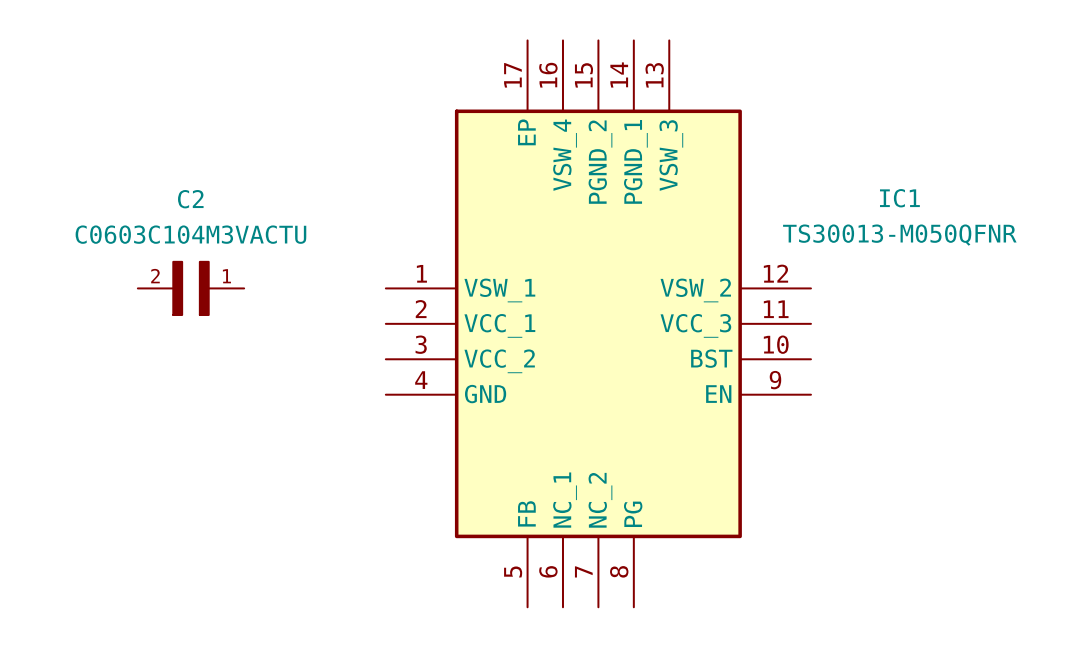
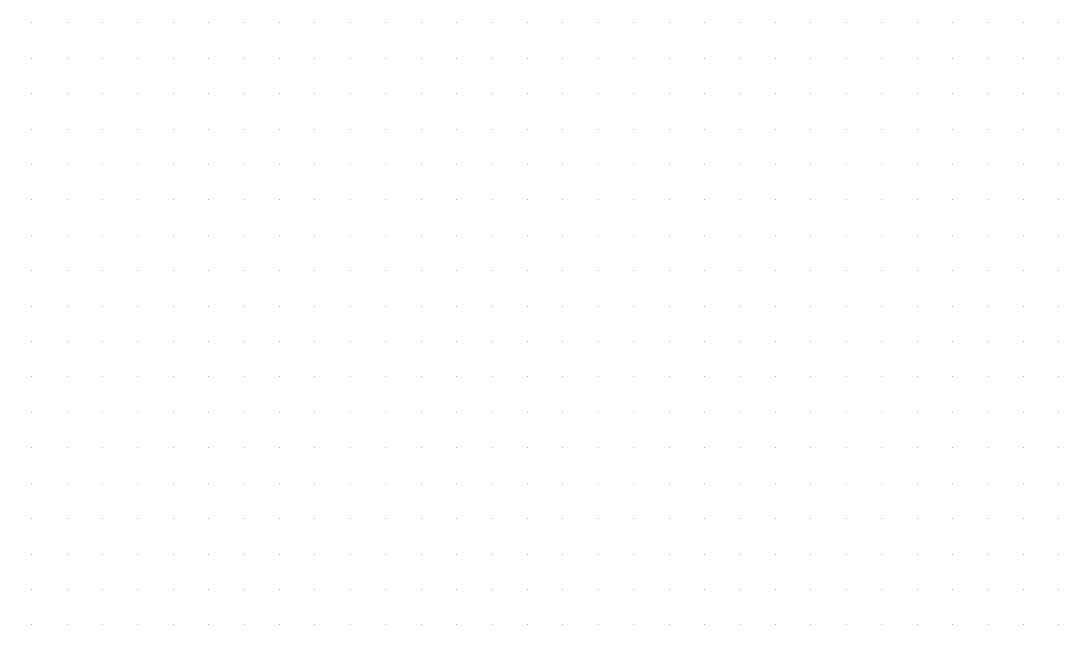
C2: C0603C104M3VACTU (191, 288) -> none
IC1: TS30013-M050QFNR (598, 323) -> none

